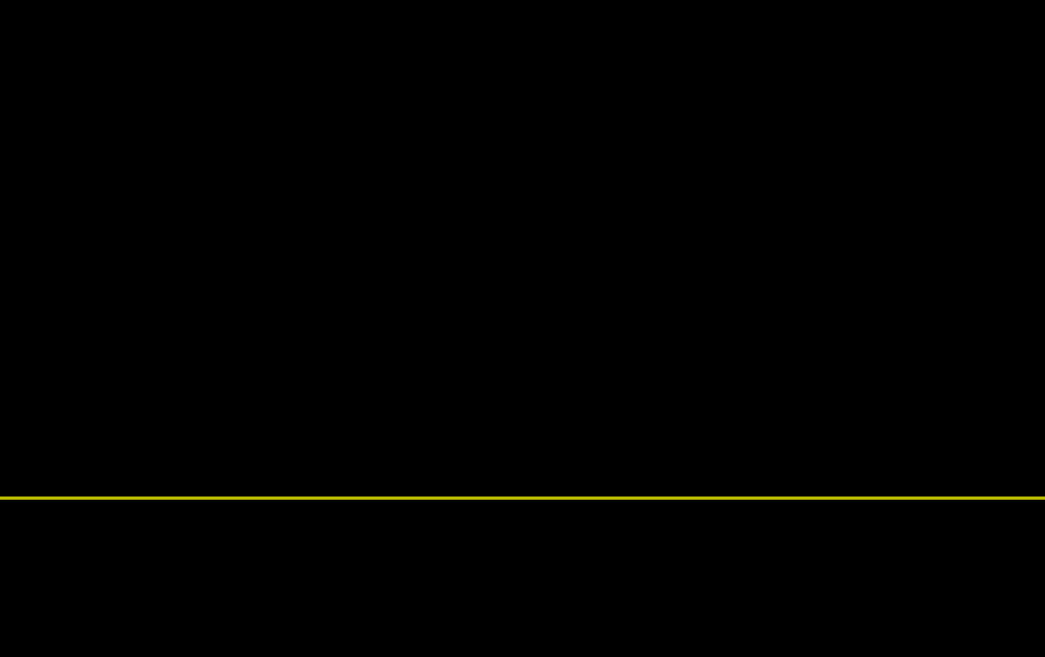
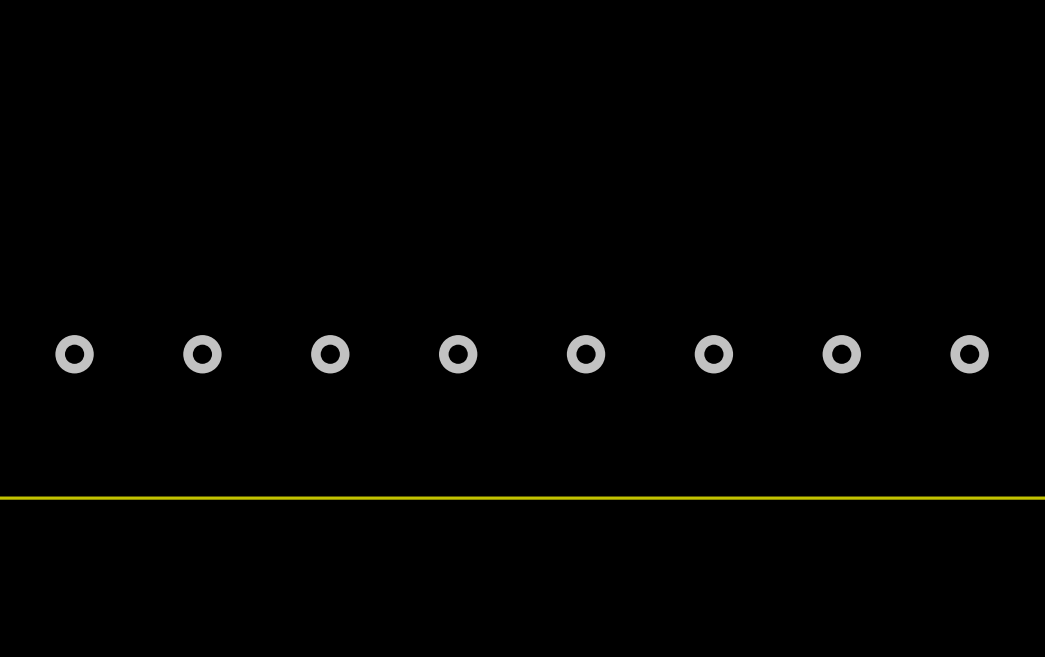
via: none -> (74, 354)
via: none -> (202, 354)
via: none -> (330, 354)
via: none -> (458, 354)
via: none -> (586, 354)
via: none -> (713, 354)
via: none -> (841, 354)
via: none -> (969, 354)

